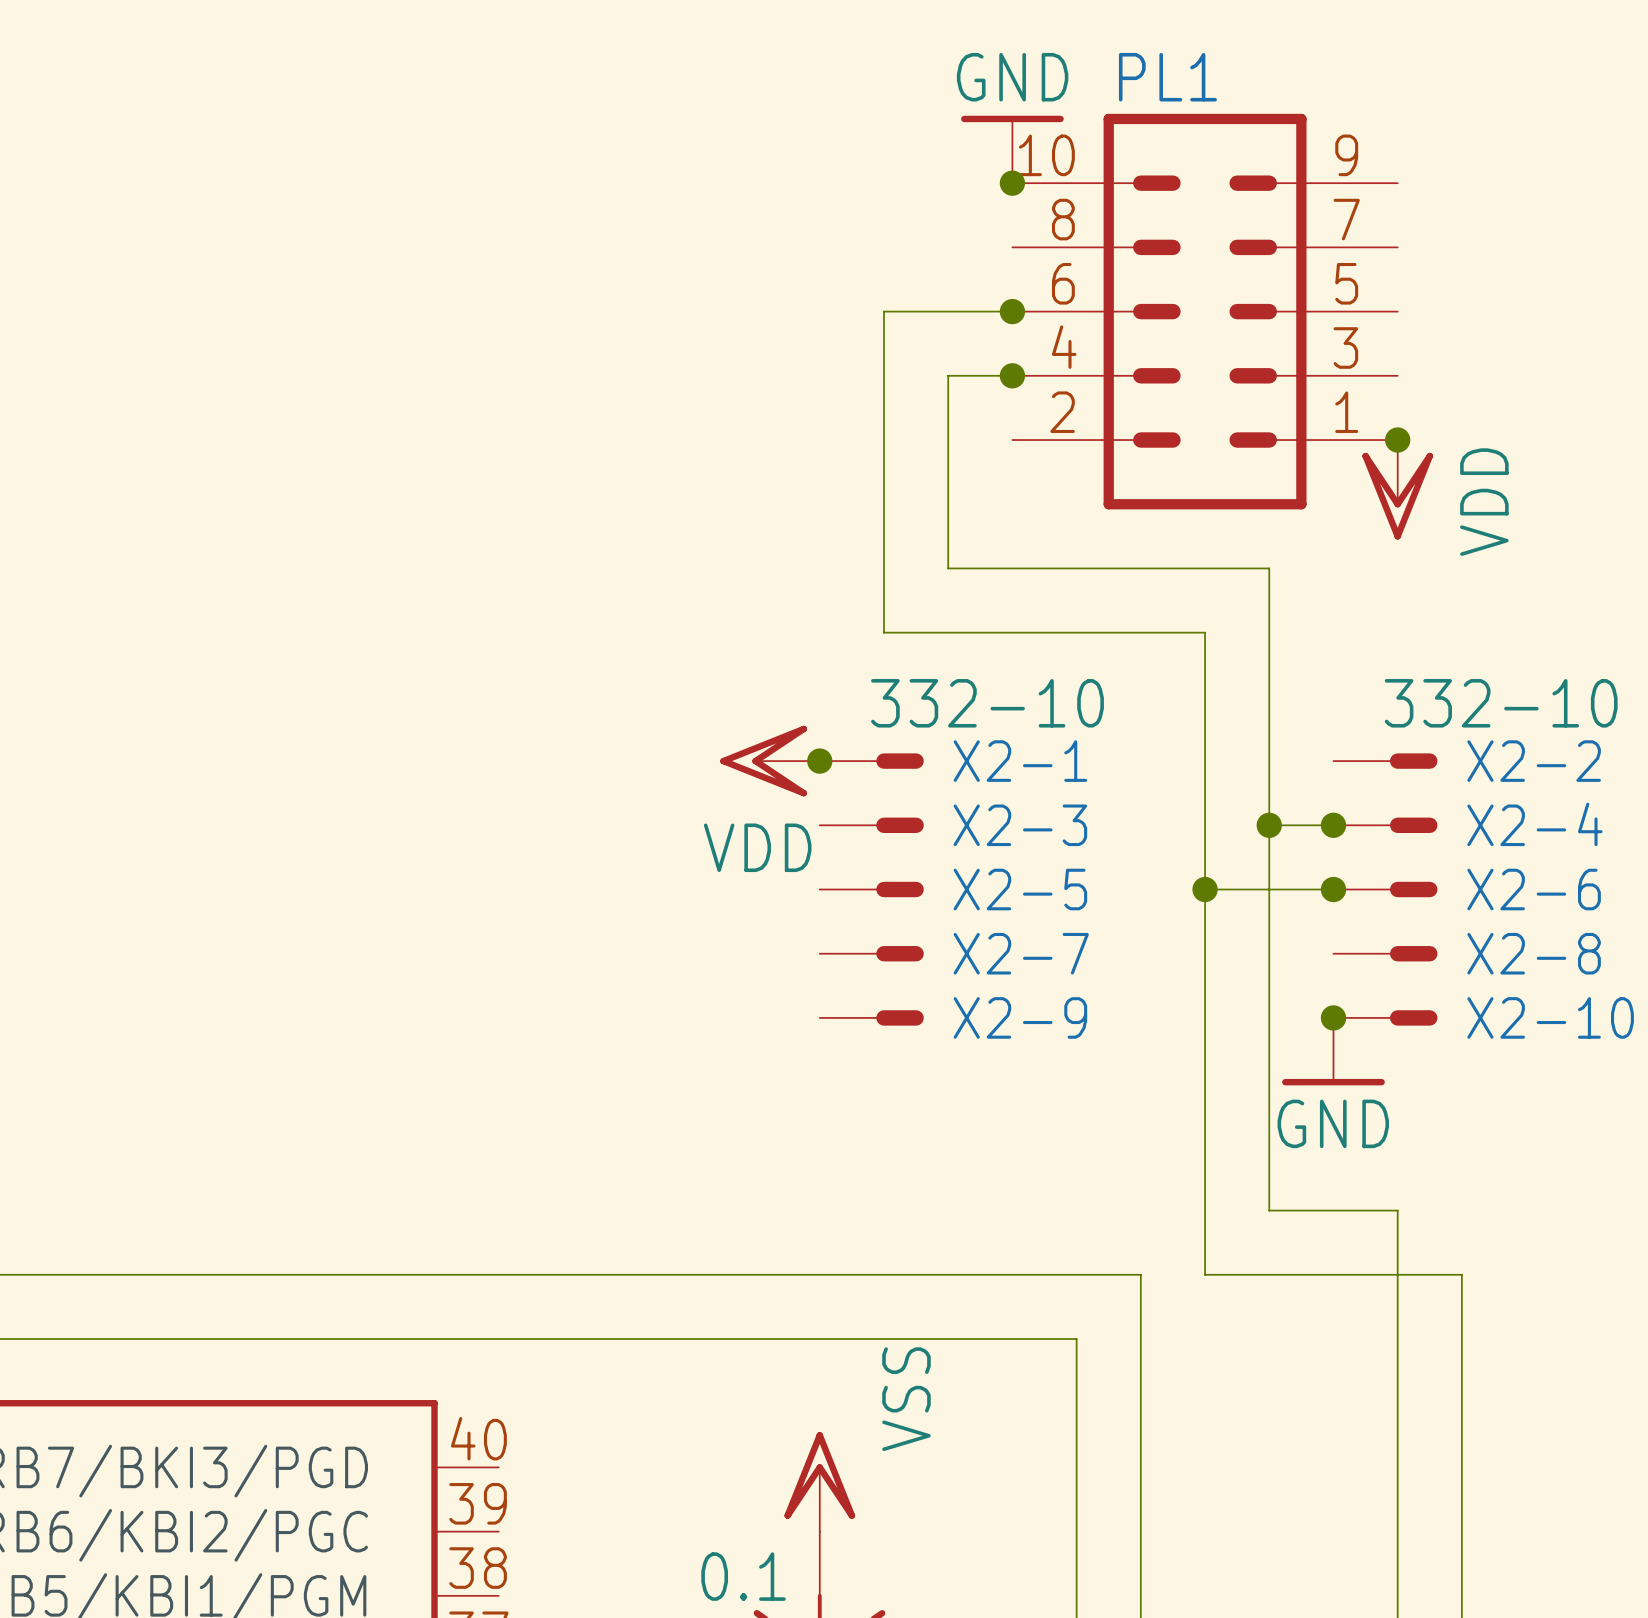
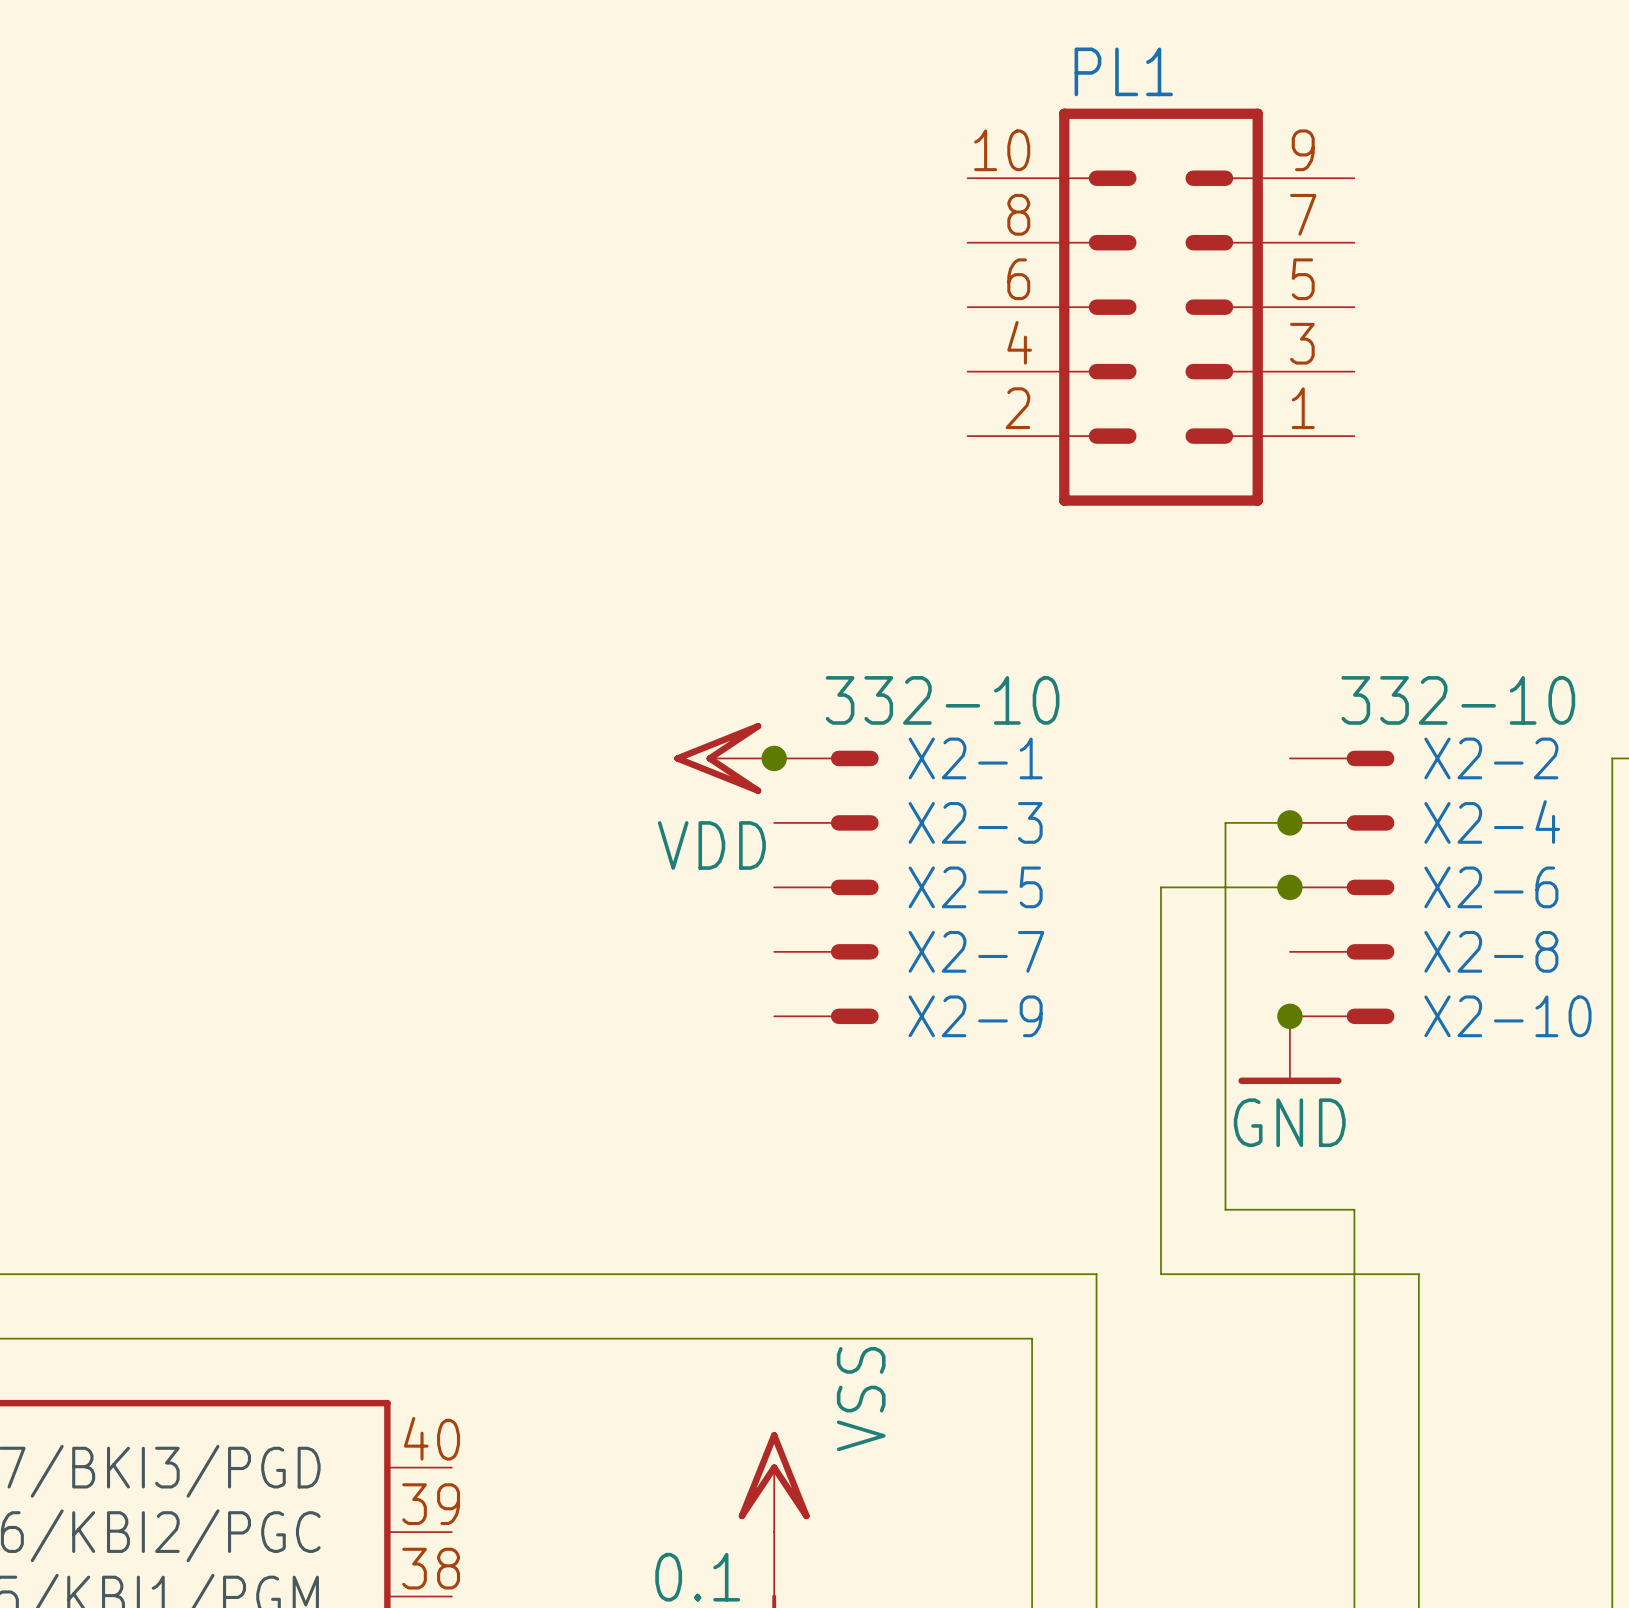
power symbol: GND (1012, 149) -> none
junction: (1012, 183) -> none
wire: (1012, 311) (883, 311) (883, 632) (1205, 632) (1205, 889) -> none
junction: (1012, 311) -> none
wire: (1012, 375) (948, 375) (948, 568) (1269, 568) (1269, 825) -> none
junction: (1012, 375) -> none
junction: (1397, 440) -> none
power symbol: VDD (1397, 489) -> none
junction: (1269, 825) -> none
junction: (1205, 889) -> none

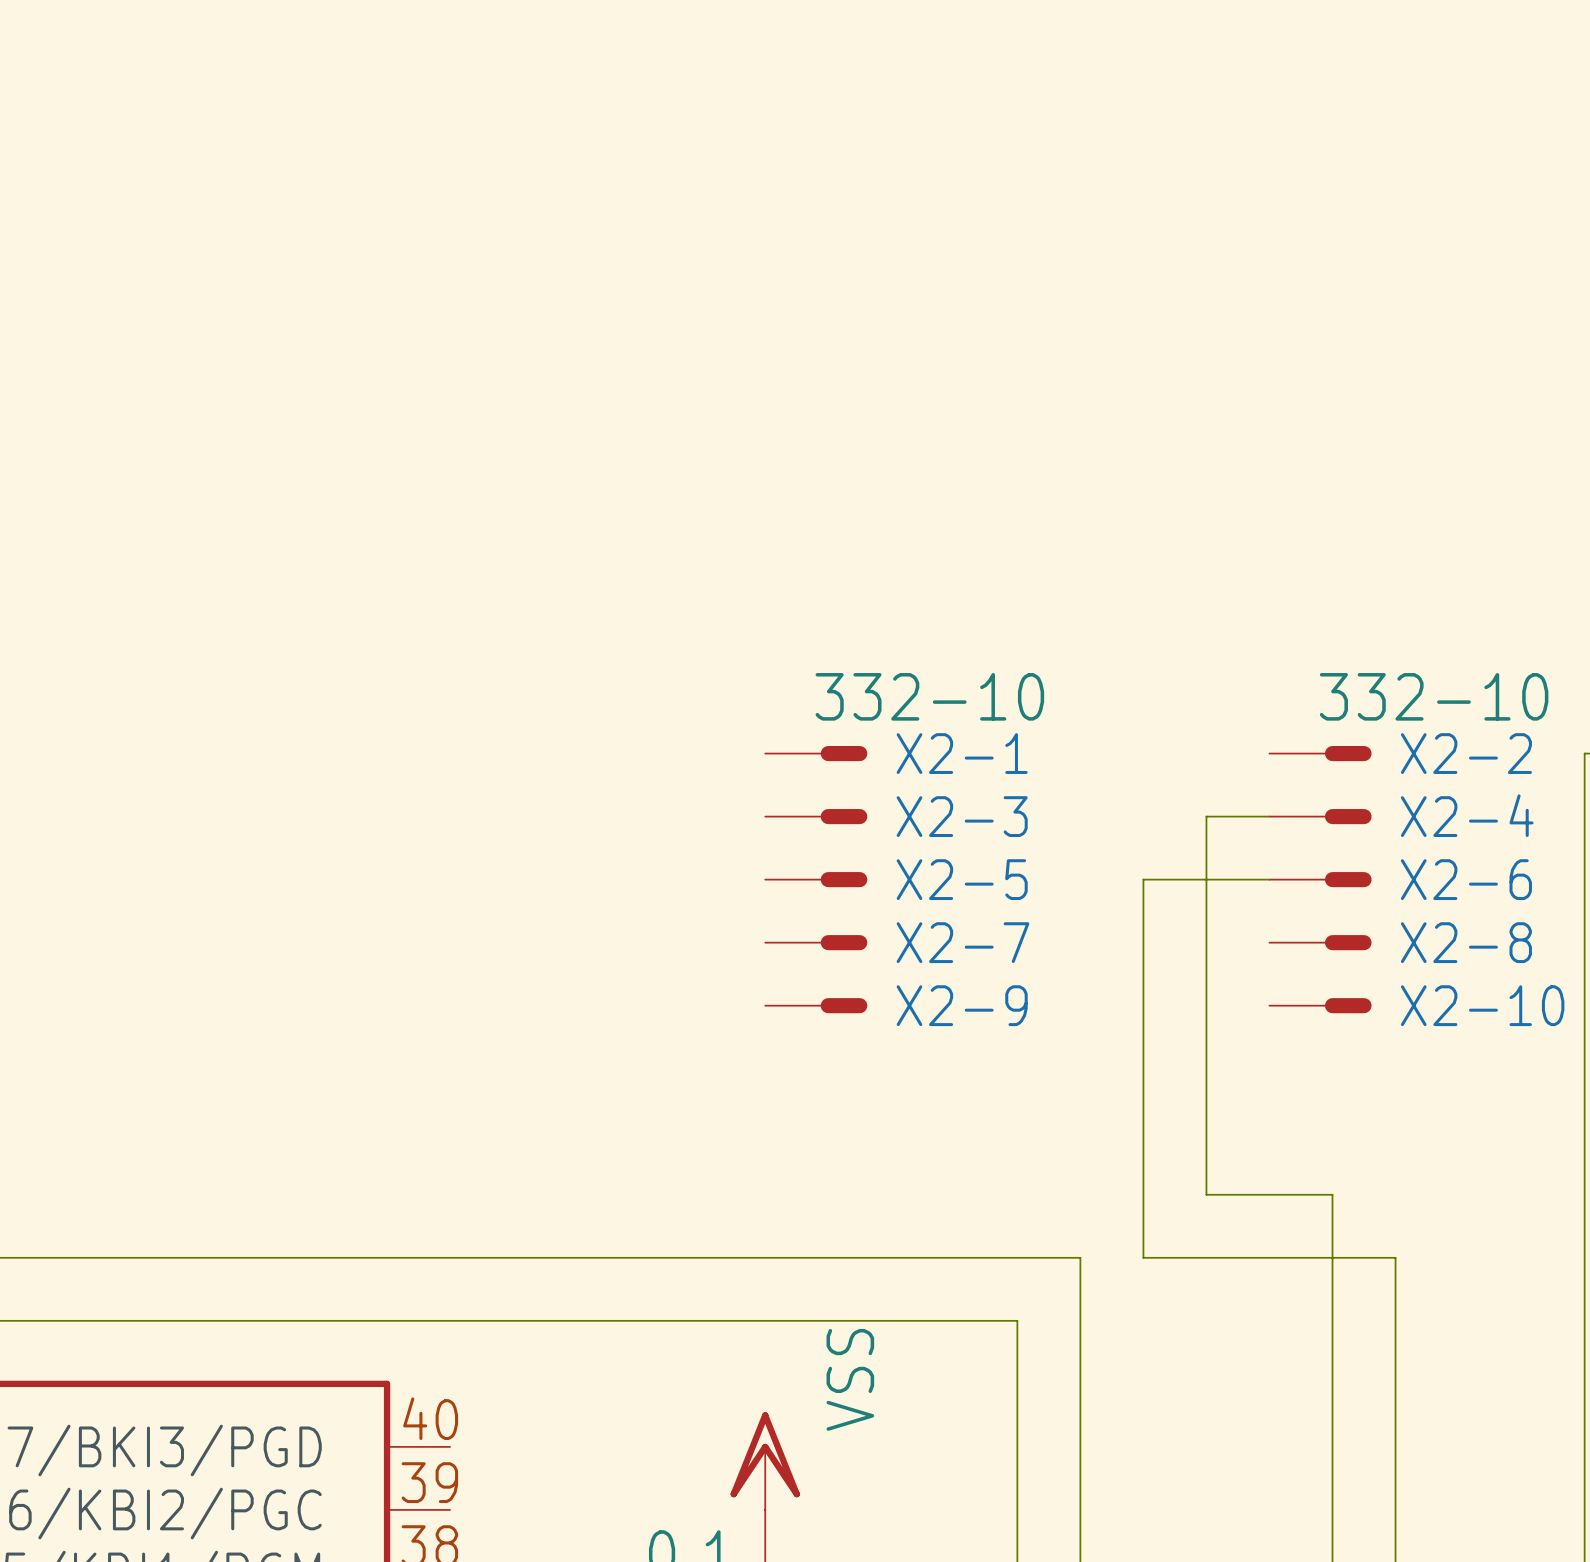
PL1: (1161, 307) -> none
power symbol: VDD (724, 758) -> none
junction: (774, 758) -> none
junction: (1289, 822) -> none
junction: (1289, 887) -> none
junction: (1289, 1016) -> none
power symbol: GND (1289, 1050) -> none

